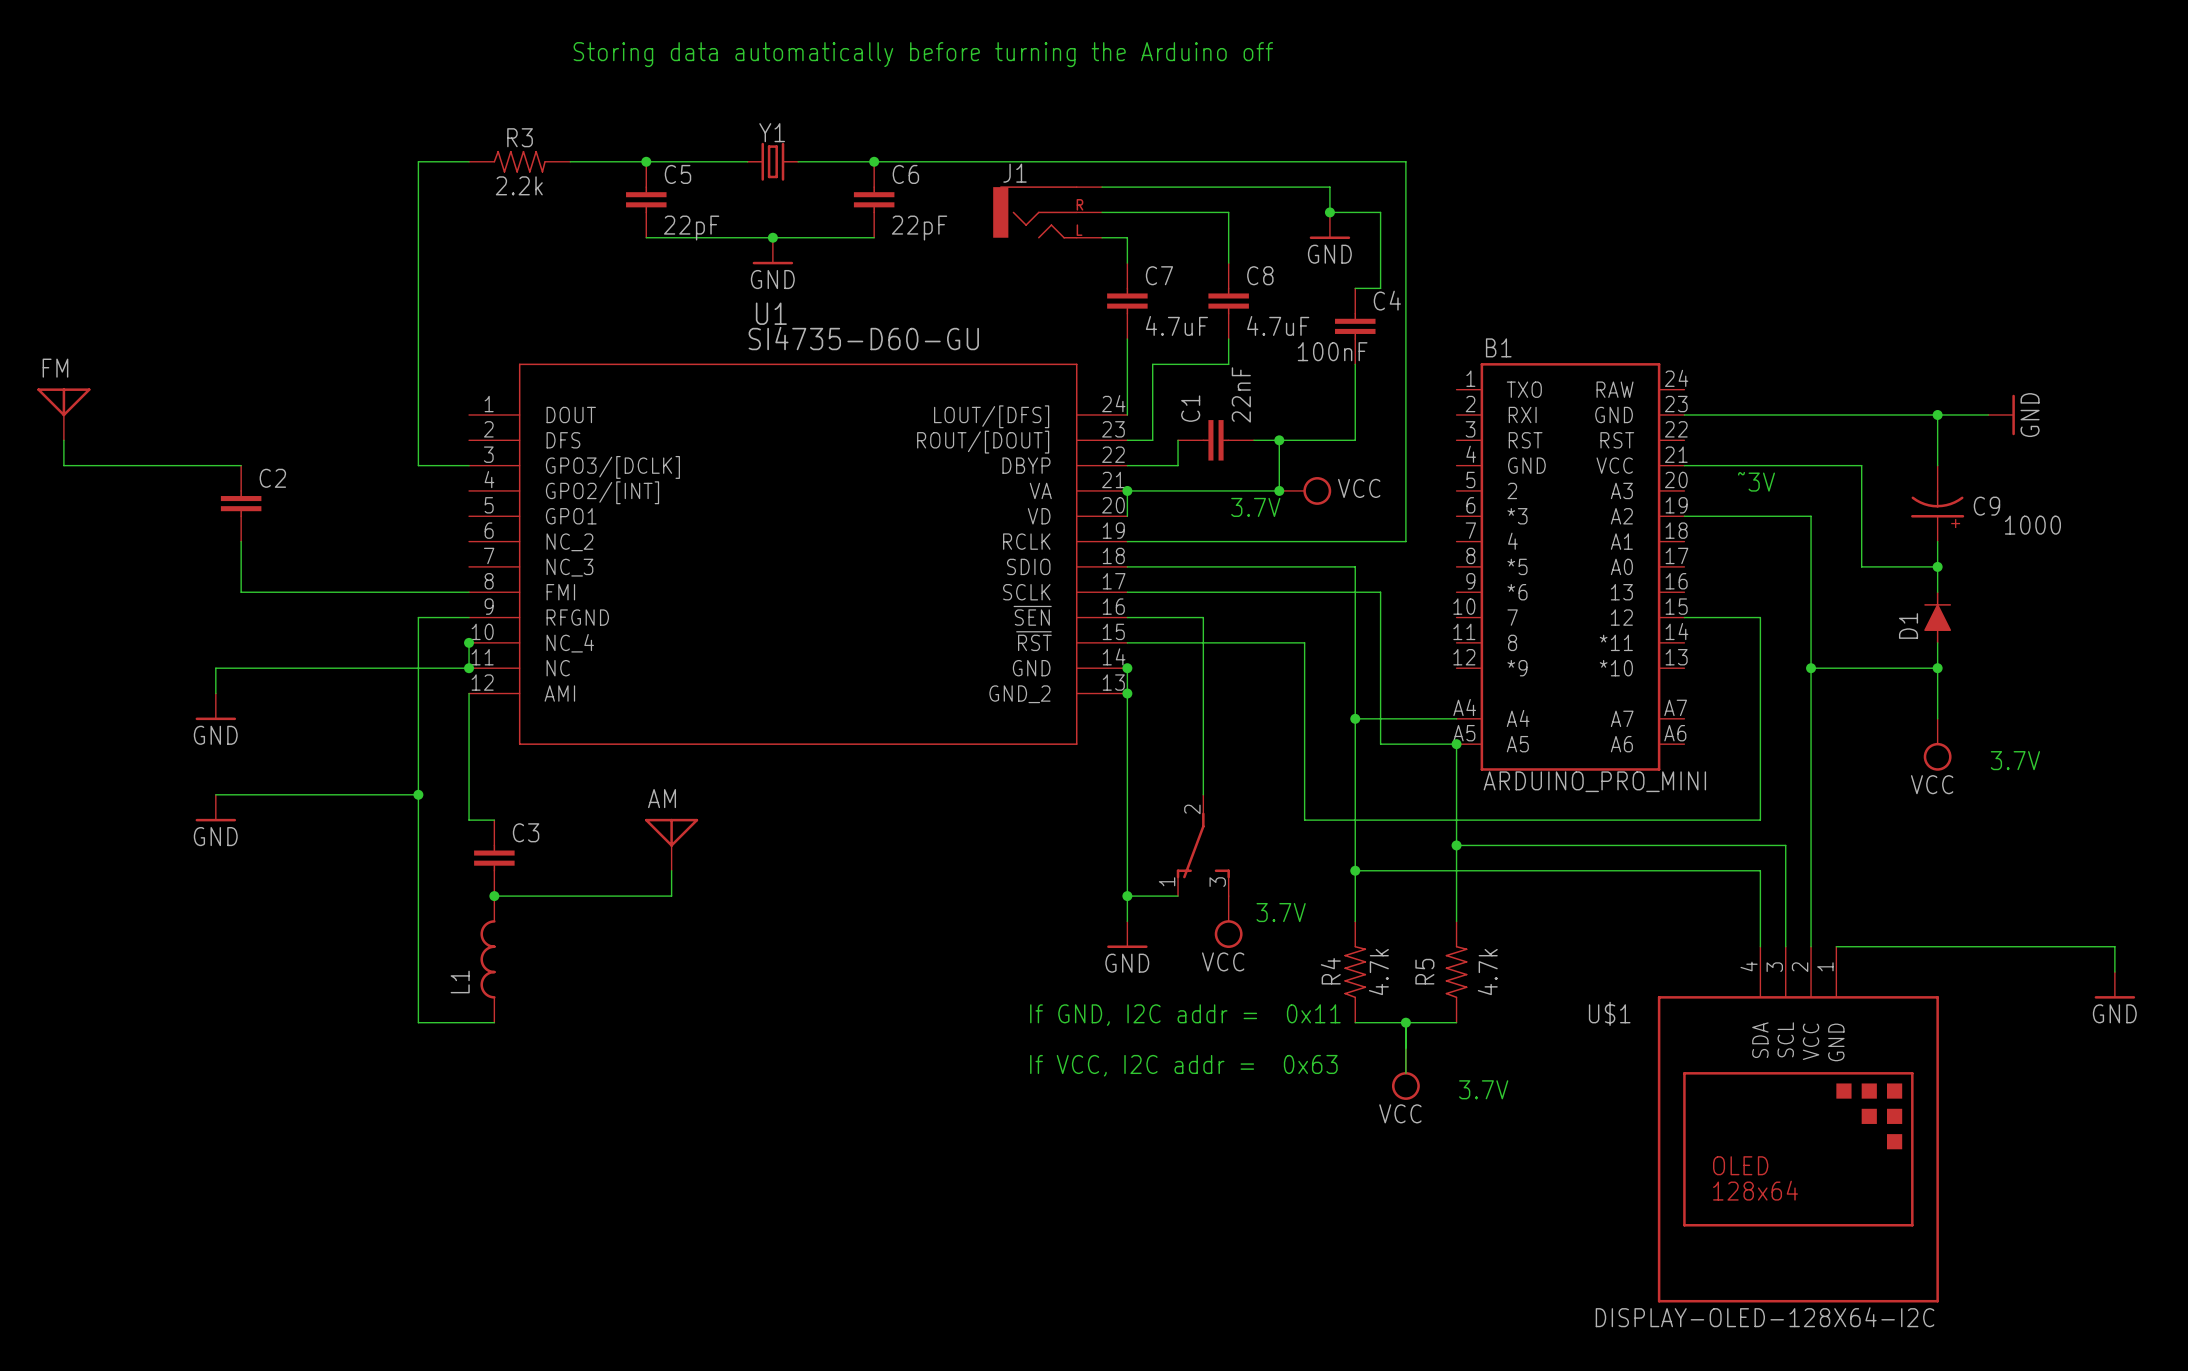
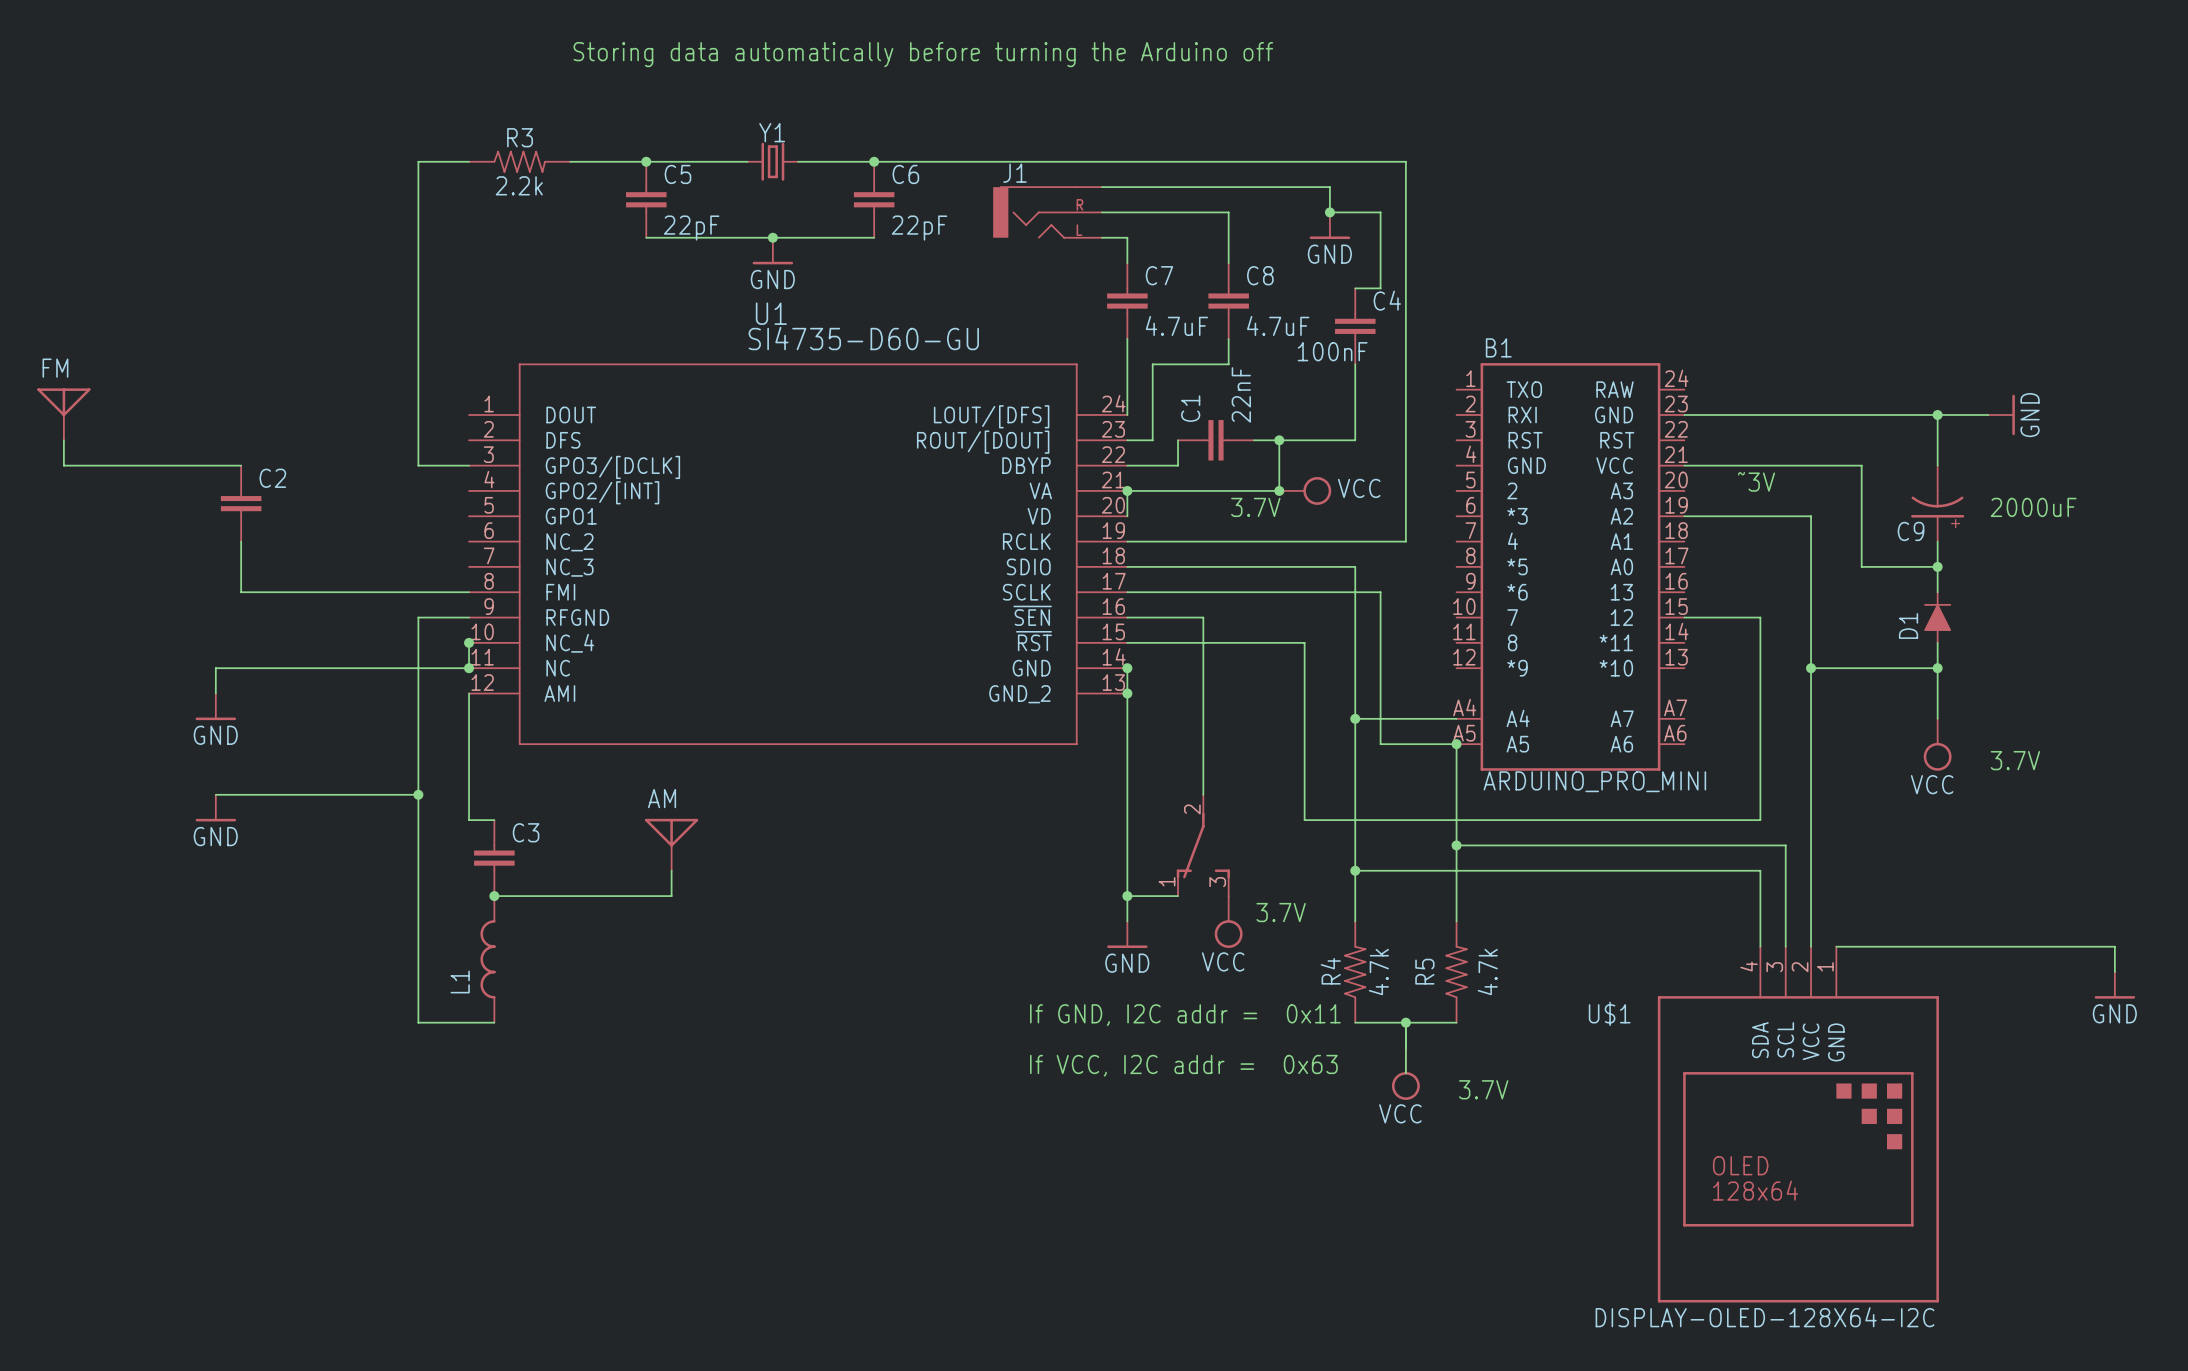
C9 name position: C9 (1986, 506) -> C9 (1911, 531)
text: none -> 2000uF (2033, 507)
C9 text: 1000 (2032, 525) -> none

